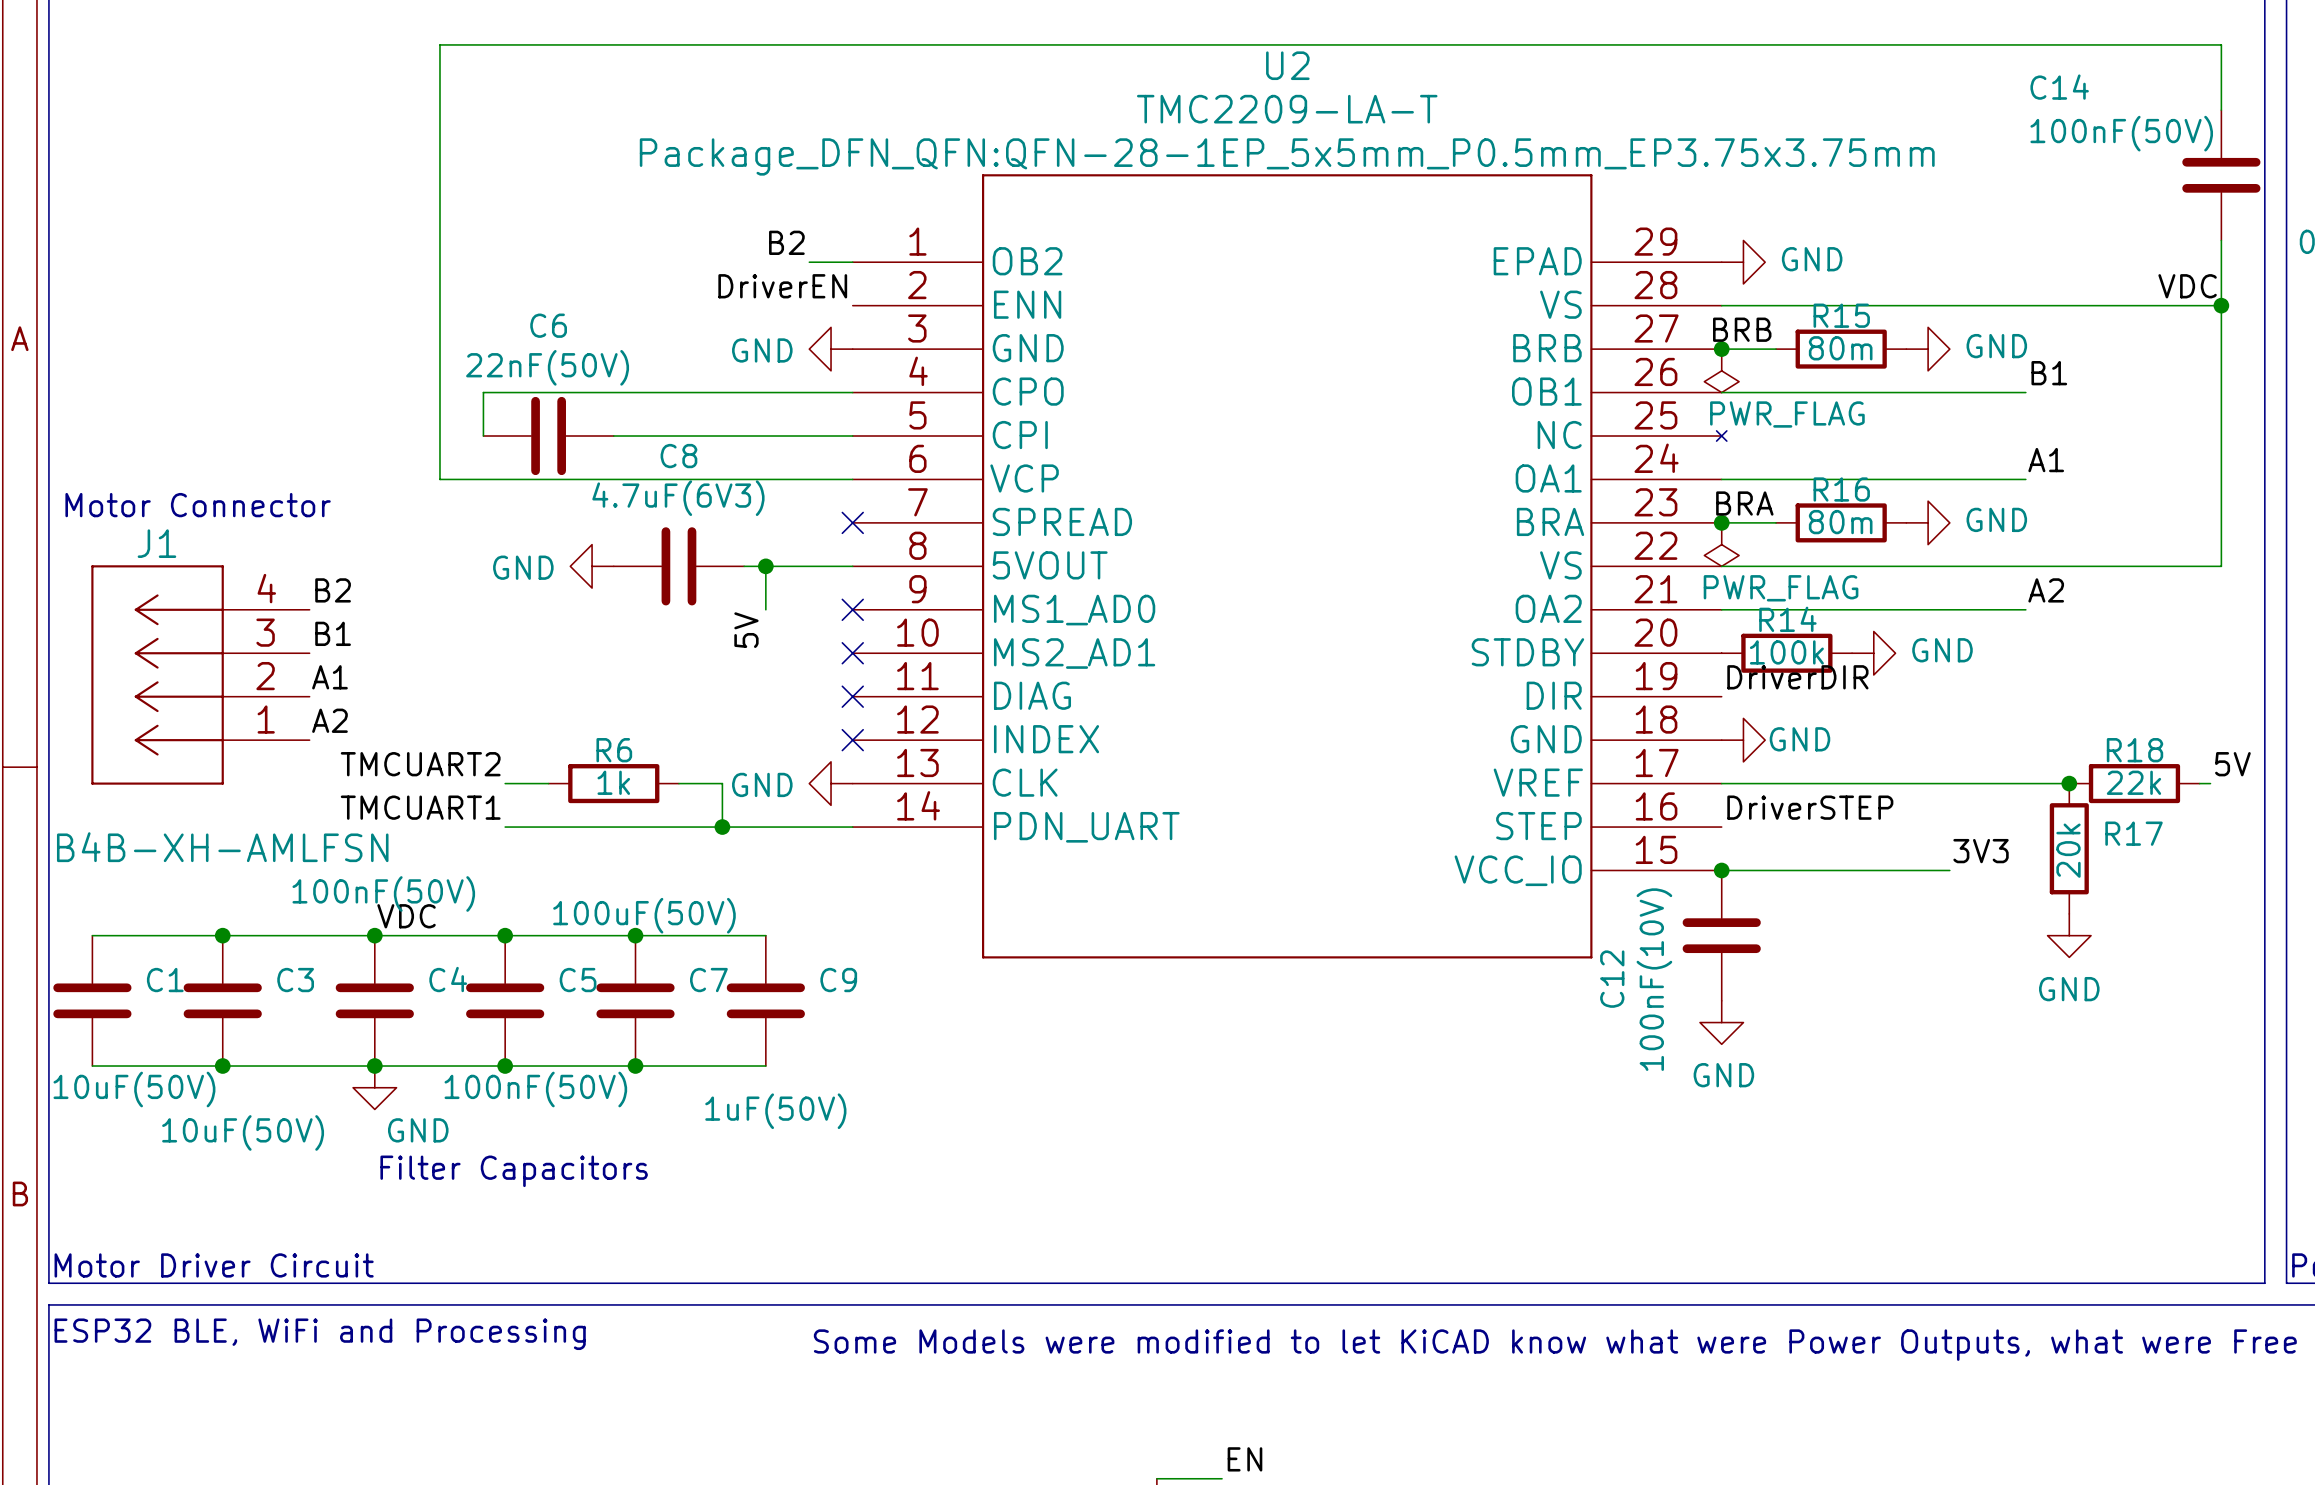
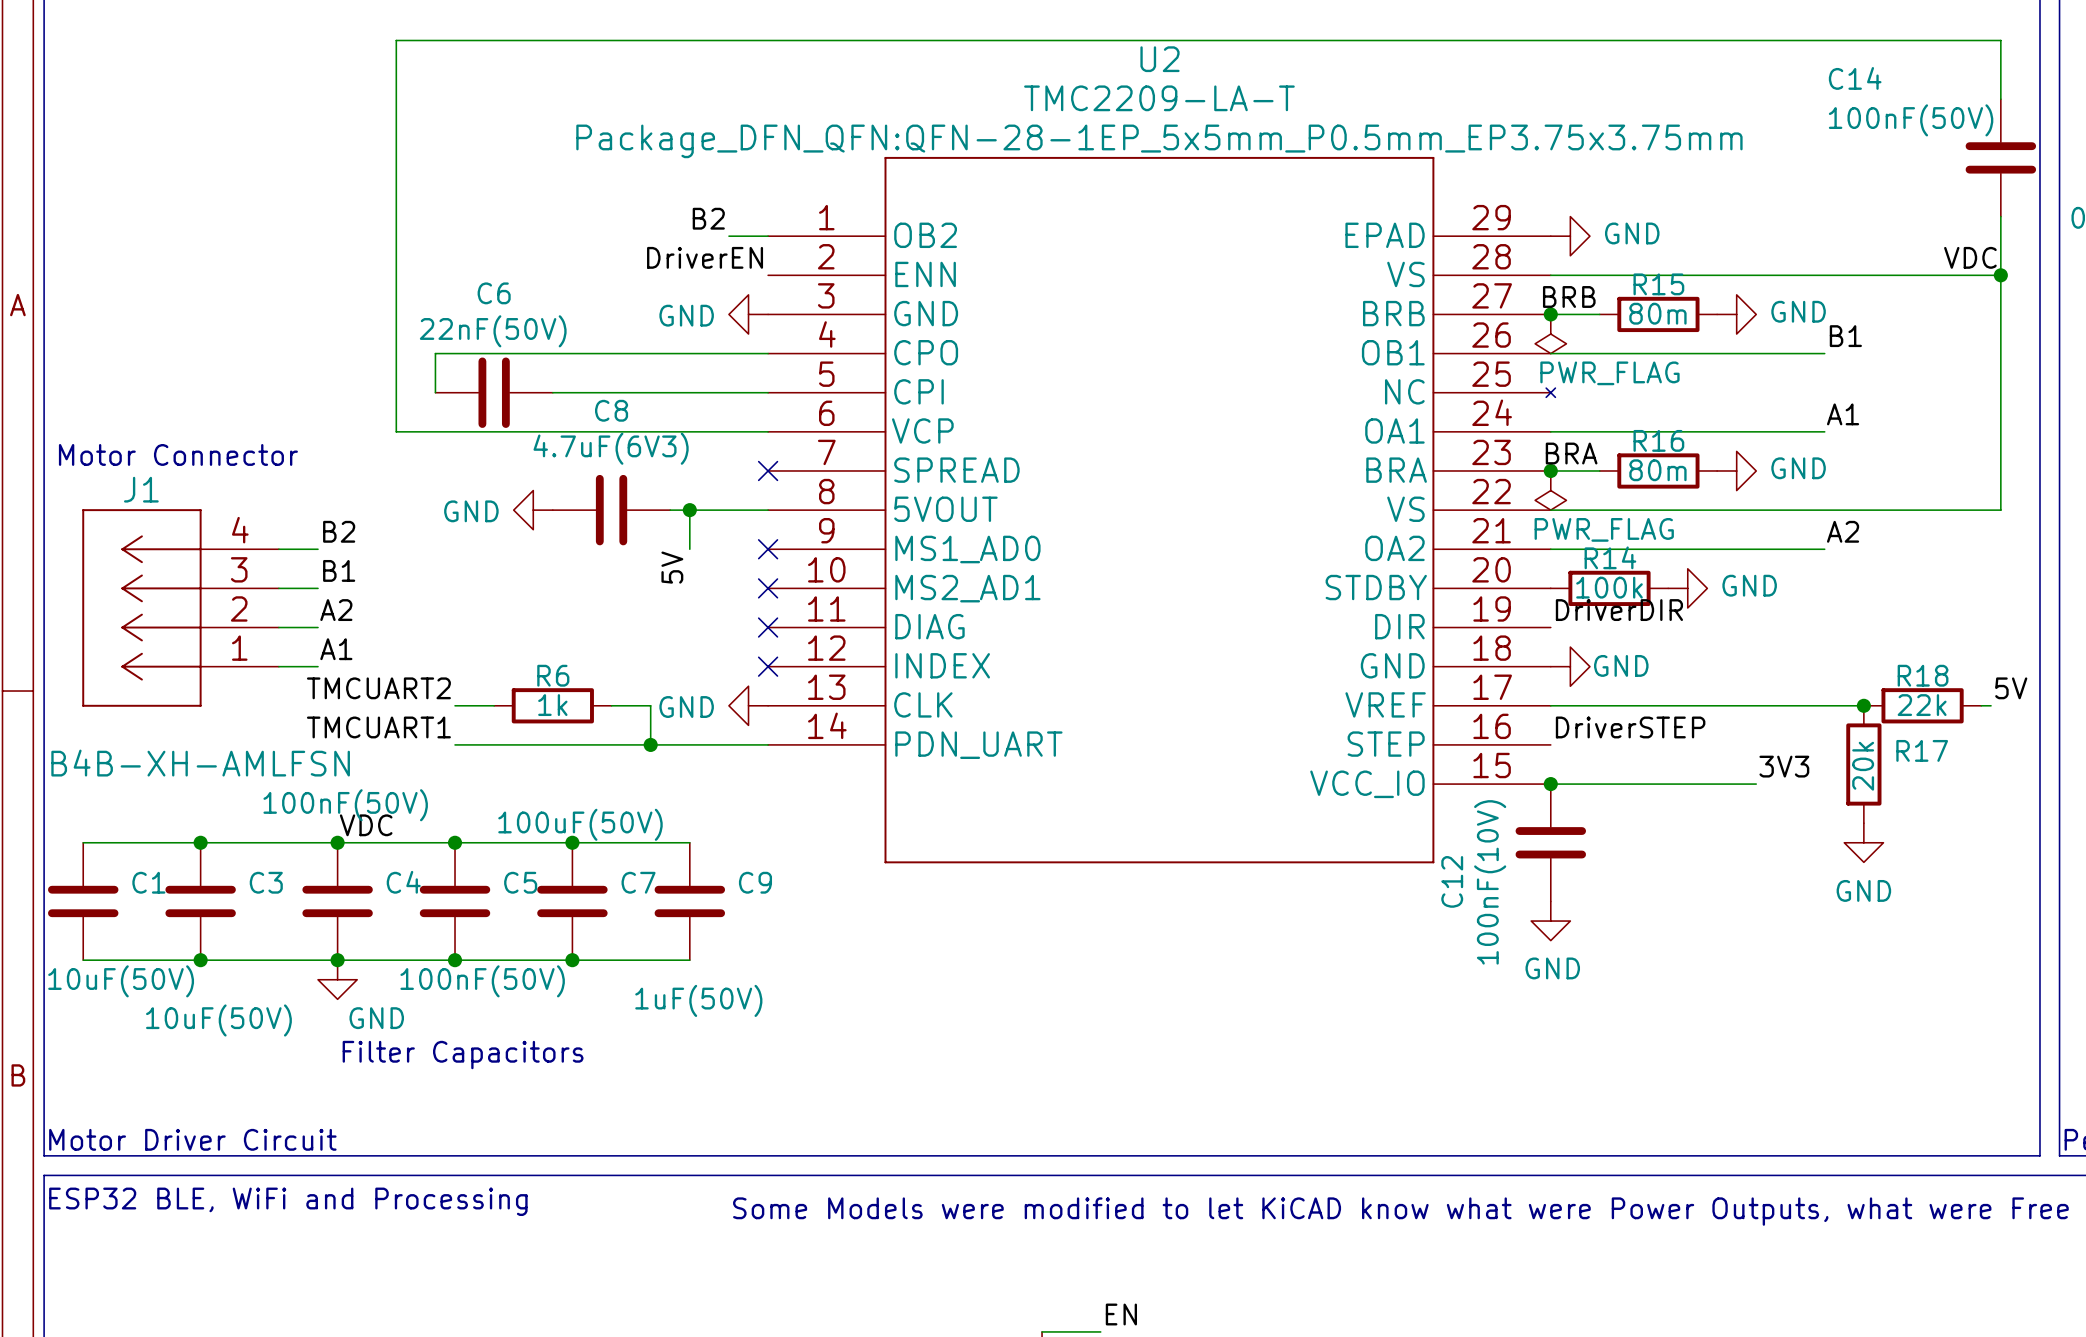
label position: B2 (333, 590) -> B2 (339, 531)
wire: none -> (278, 549) (318, 549)
label position: B1 (333, 633) -> B1 (339, 570)
wire: none -> (278, 588) (318, 588)
label position: A1 (329, 677) -> A1 (336, 649)
wire: none -> (278, 627) (318, 627)
label position: A2 (329, 720) -> A2 (336, 610)
wire: none -> (278, 666) (318, 666)

